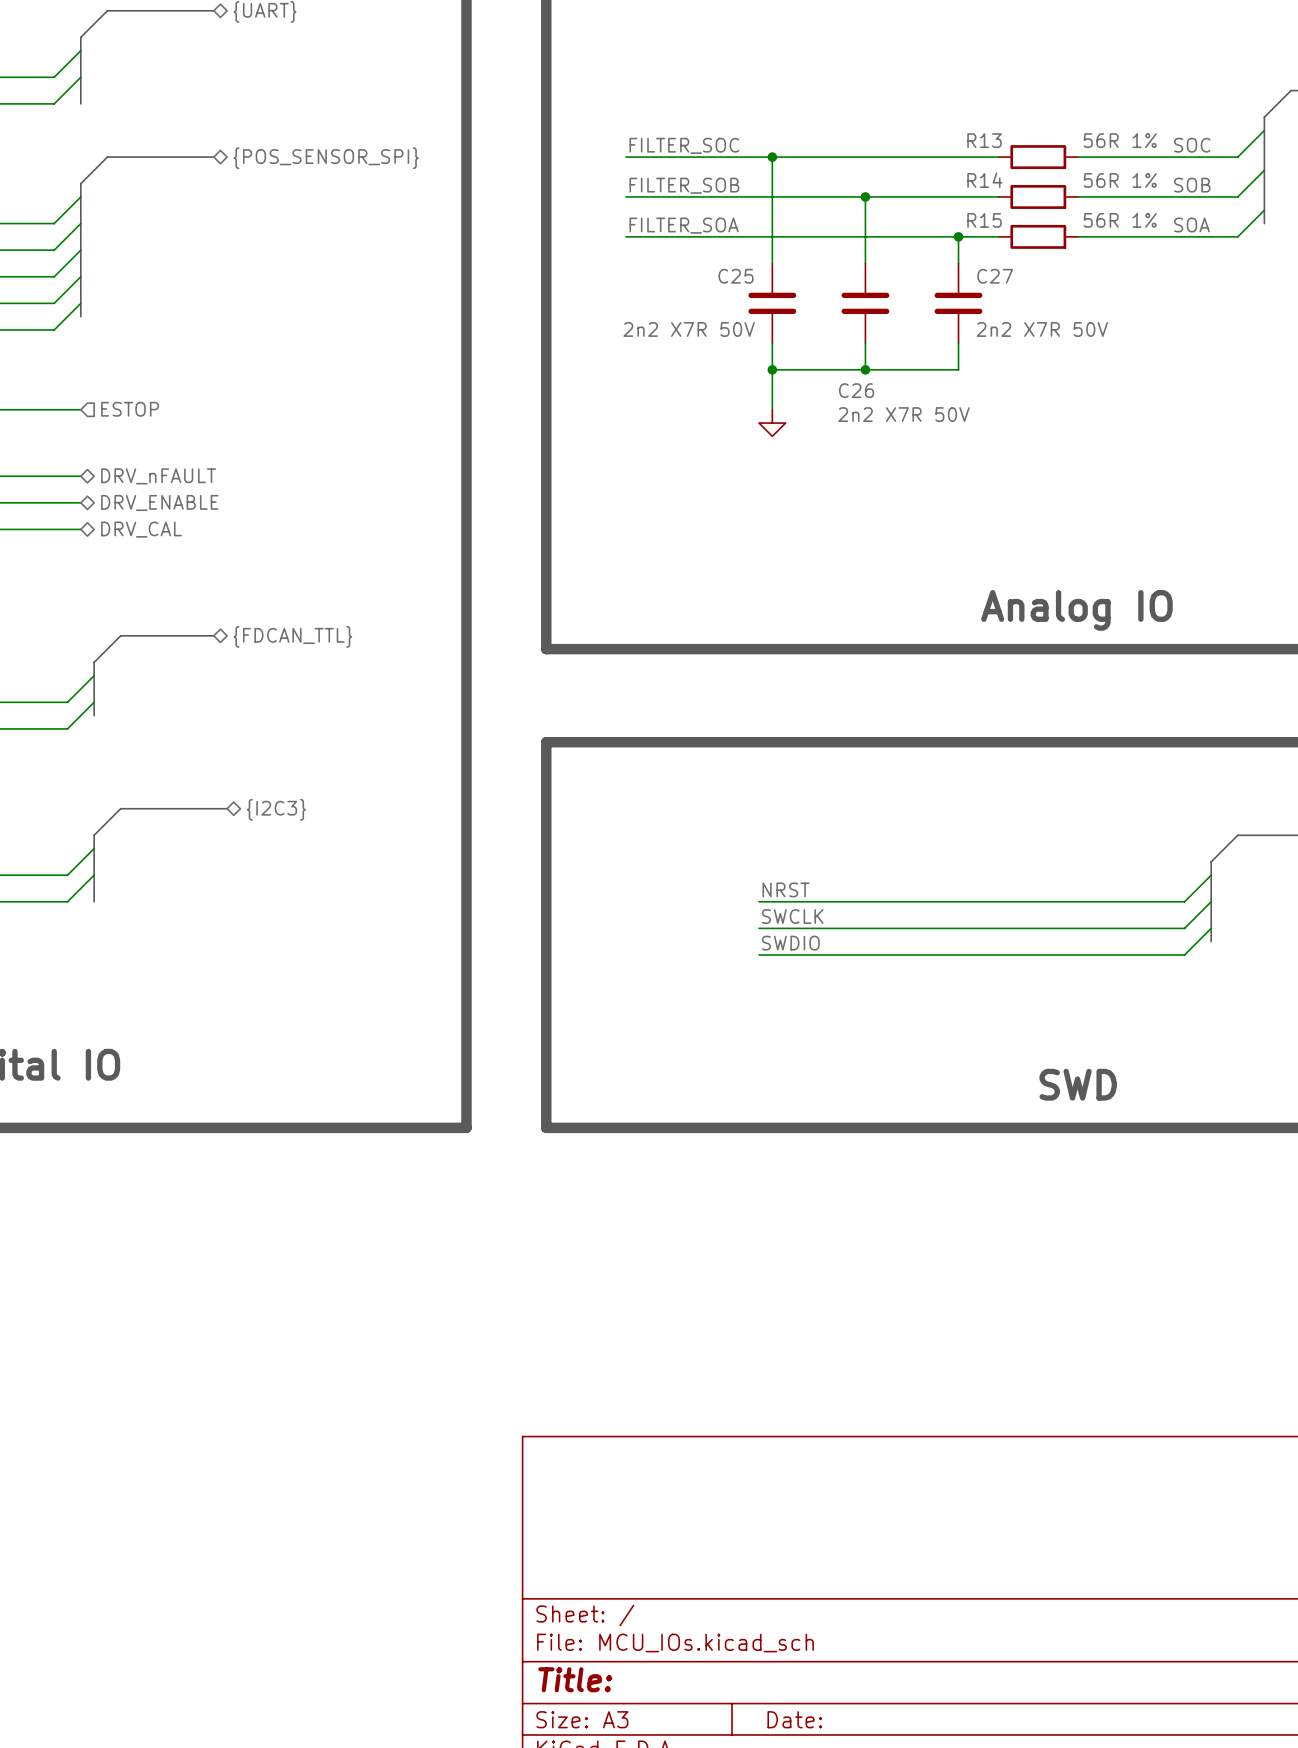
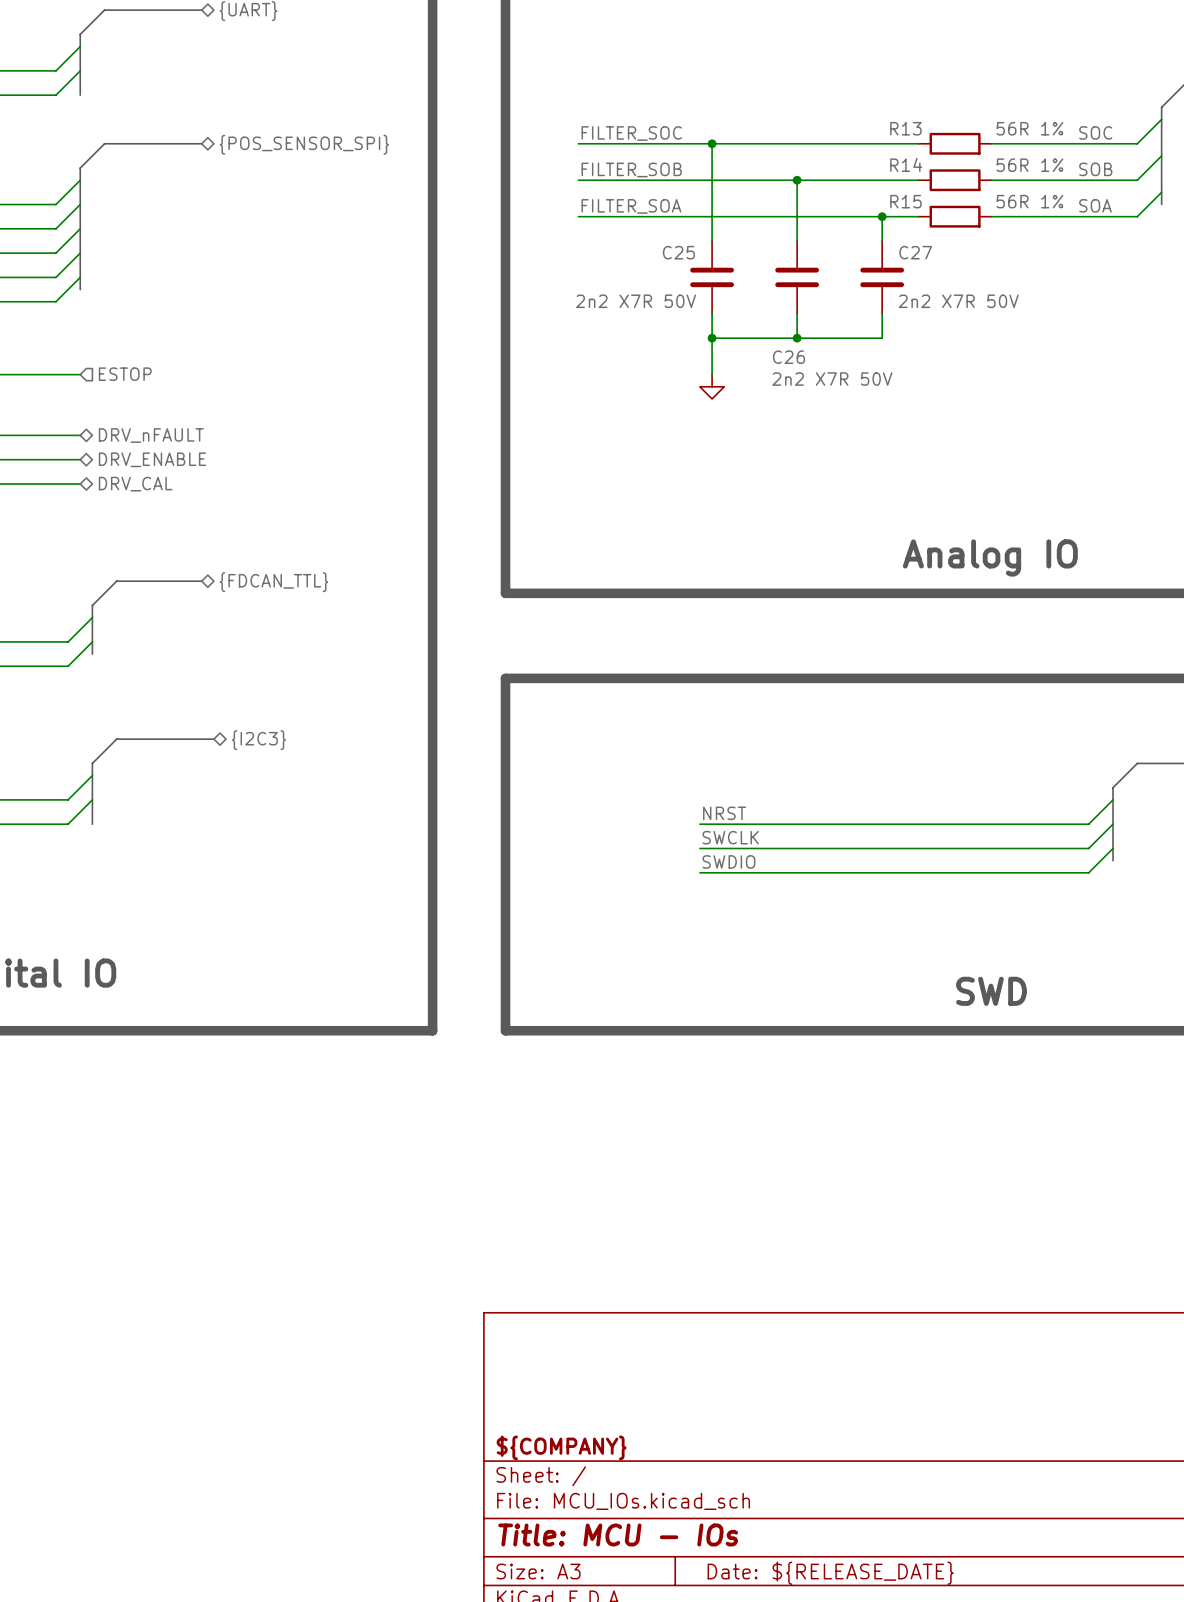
title block: none -> ${COMPANY} (561, 1447)
title block: Title: (575, 1679) -> Title: MCU - IOs (618, 1534)
title block: Date: (794, 1719) -> Date: ${RELEASE_DATE} (830, 1573)

